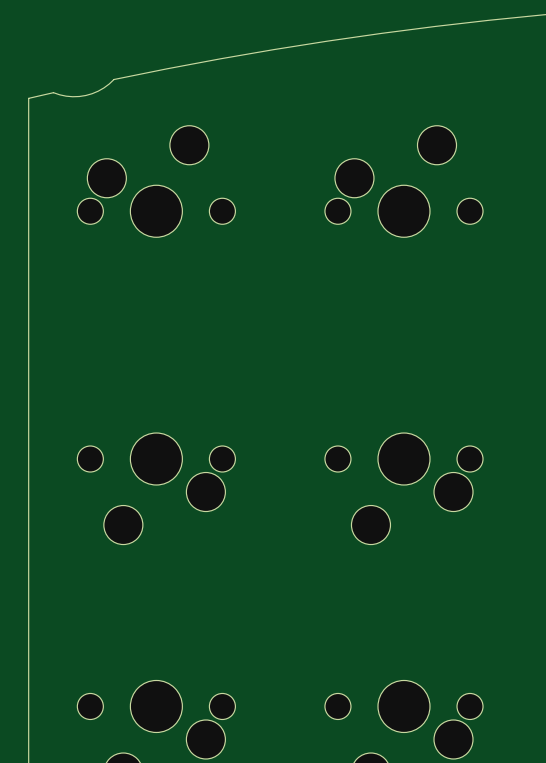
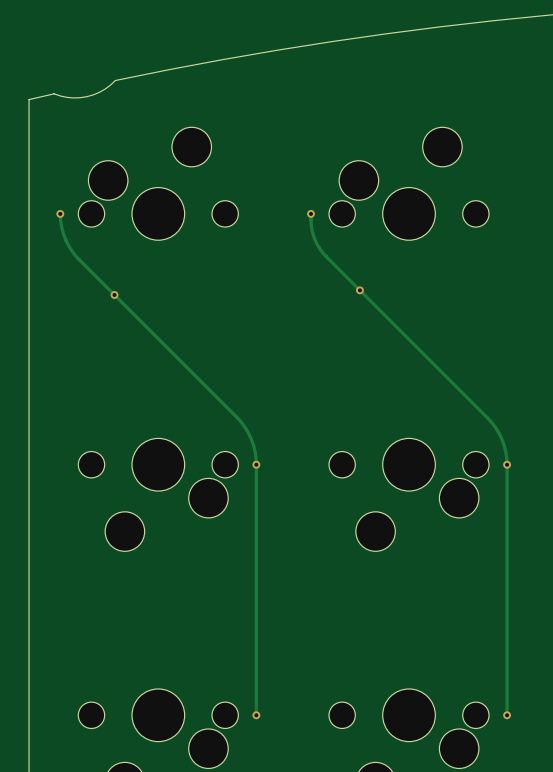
track: none -> (60, 213) (63, 233) (75, 255) (236, 417) (251, 438) (256, 464) (256, 715)
via: none -> (60, 213)
track: none -> (310, 213) (313, 234) (322, 252) (487, 418) (502, 439) (507, 464) (507, 715)
via: none -> (310, 213)
via: none -> (359, 290)
via: none -> (114, 294)
via: none -> (256, 464)
via: none -> (507, 464)
via: none -> (256, 715)
via: none -> (507, 715)

